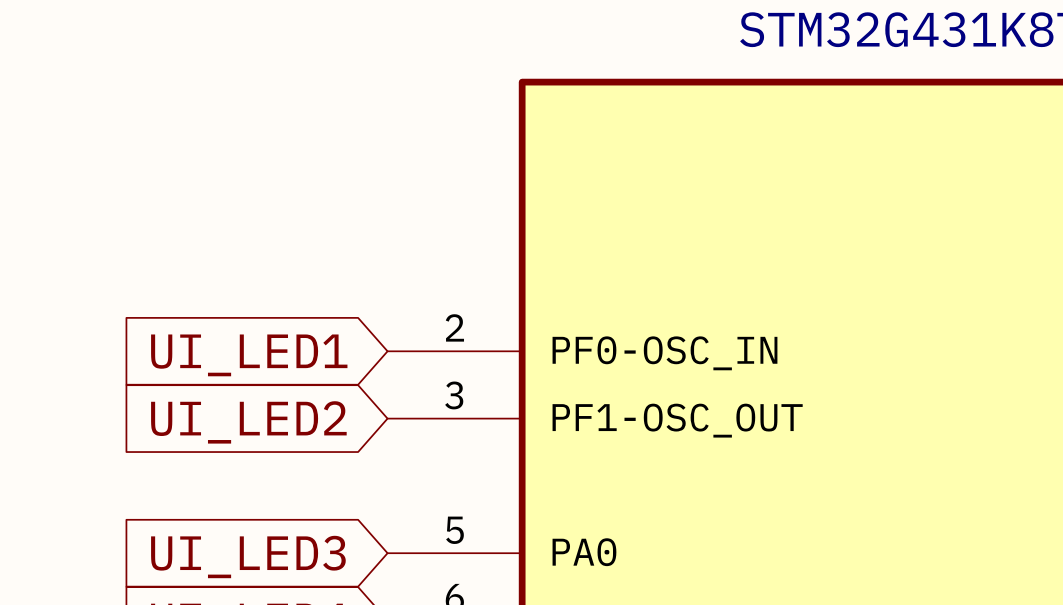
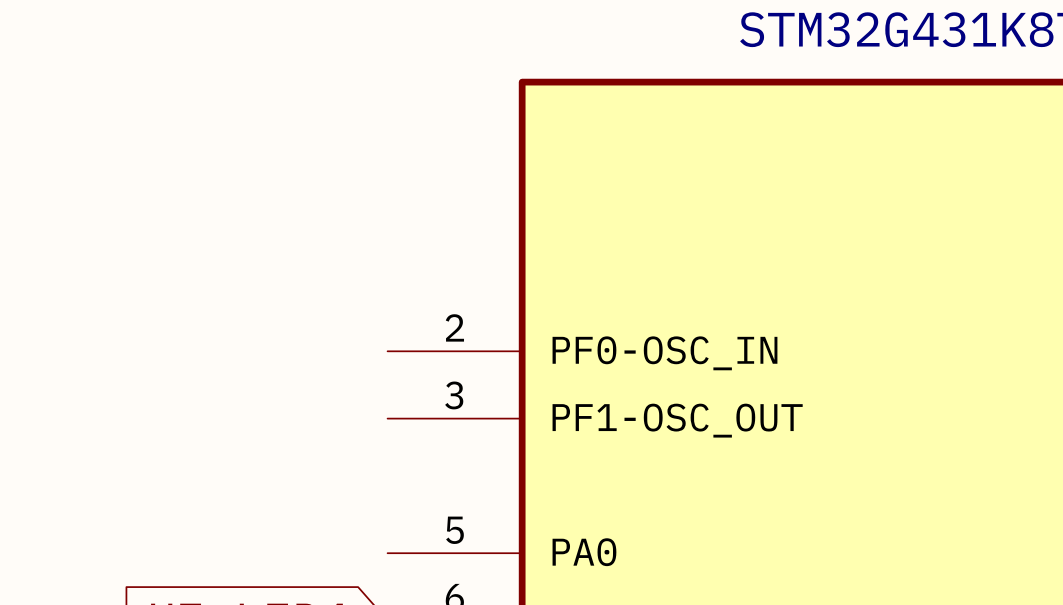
global label: UI_LED1 (249, 355) -> none
global label: UI_LED2 (248, 422) -> none
global label: UI_LED3 (248, 556) -> none

